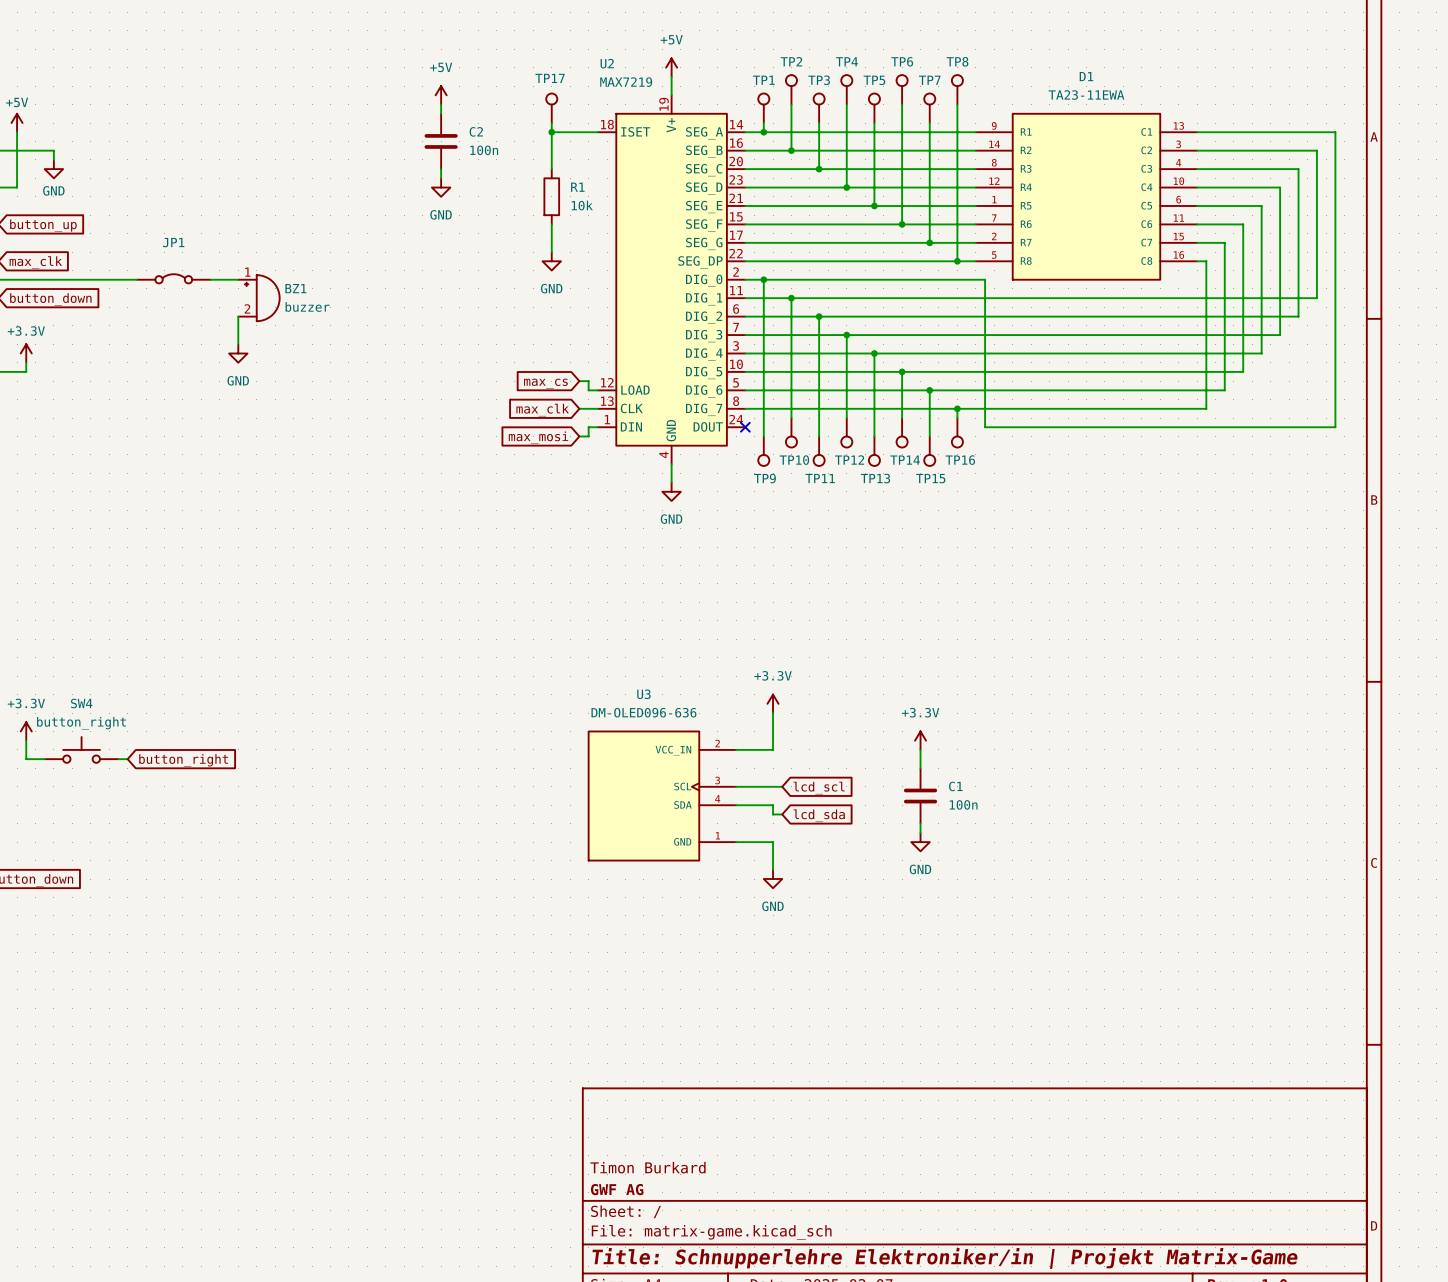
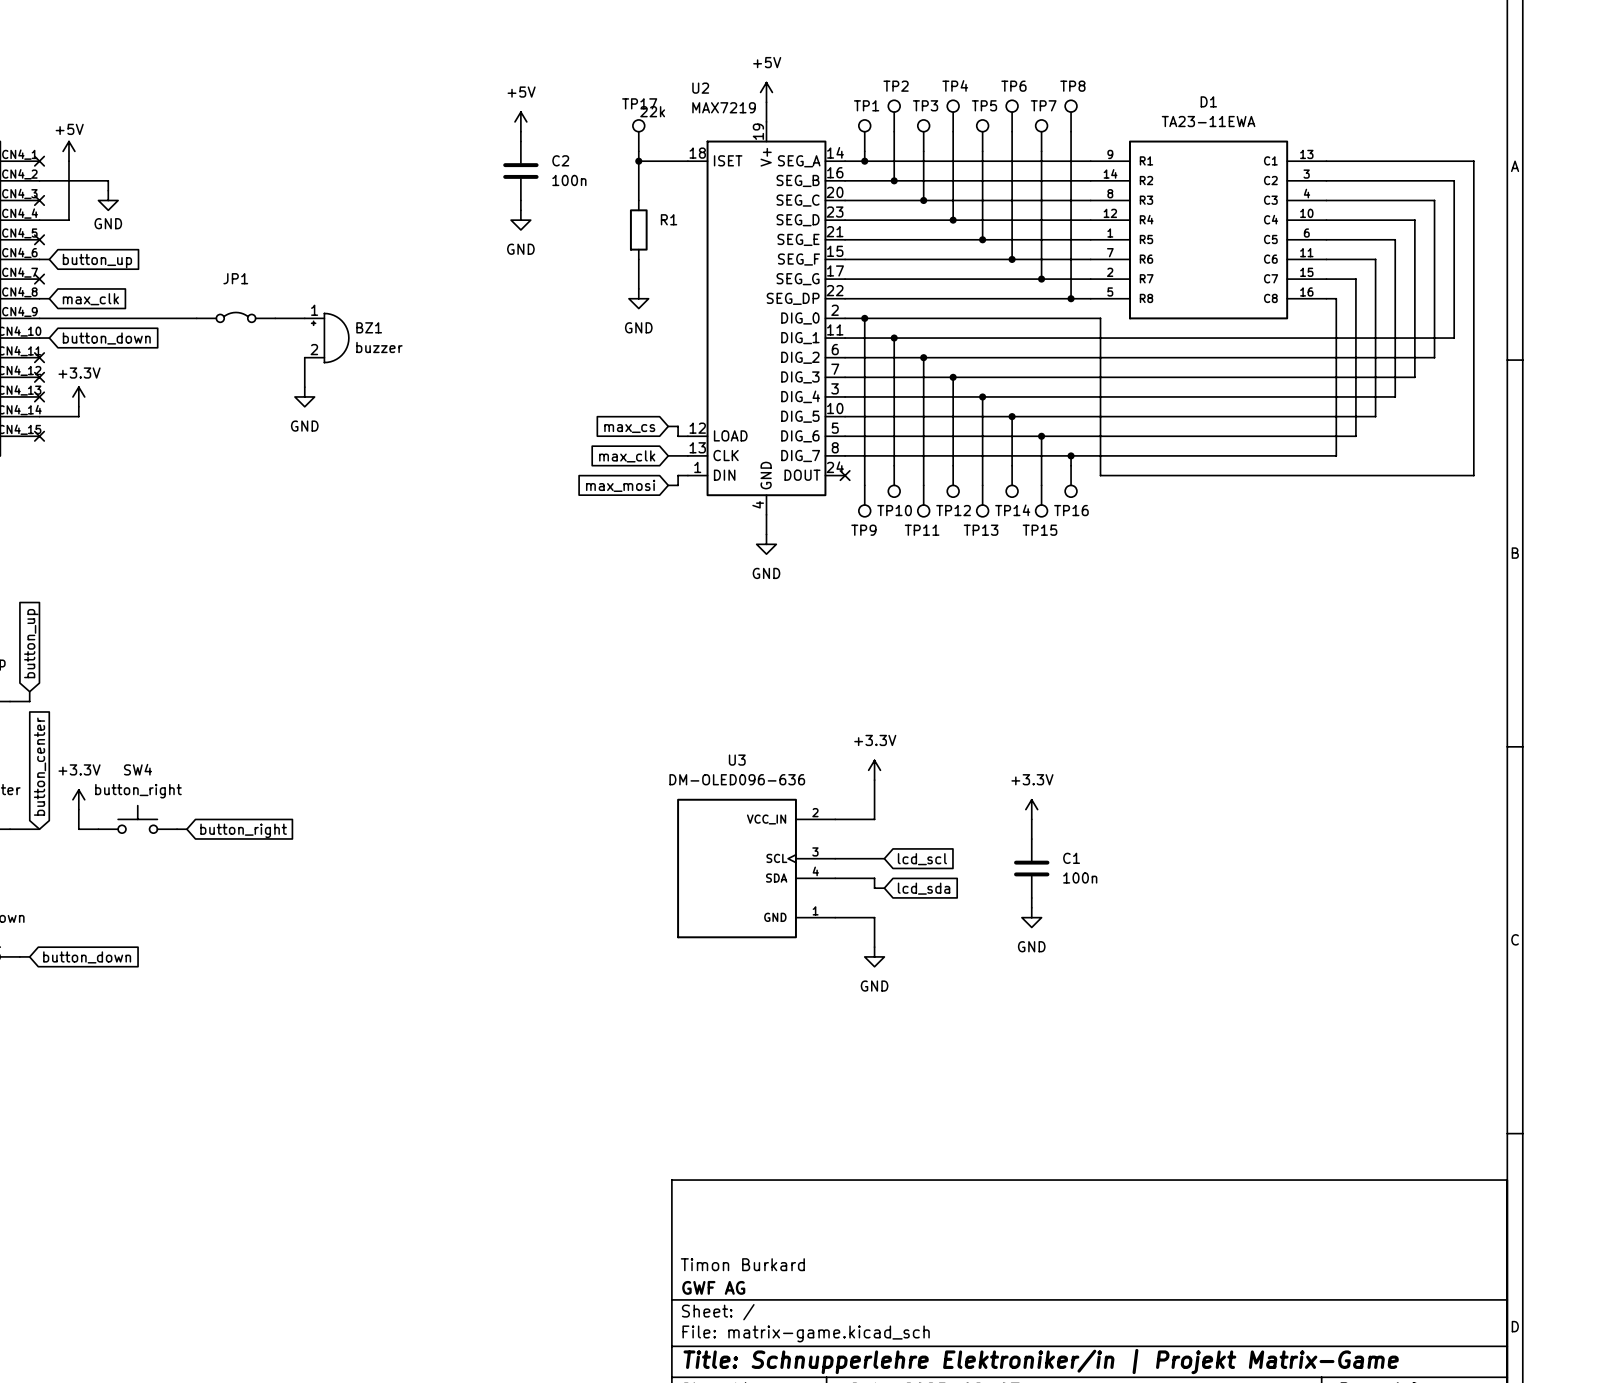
R1 value: 10k (582, 205) -> 22k (652, 111)

